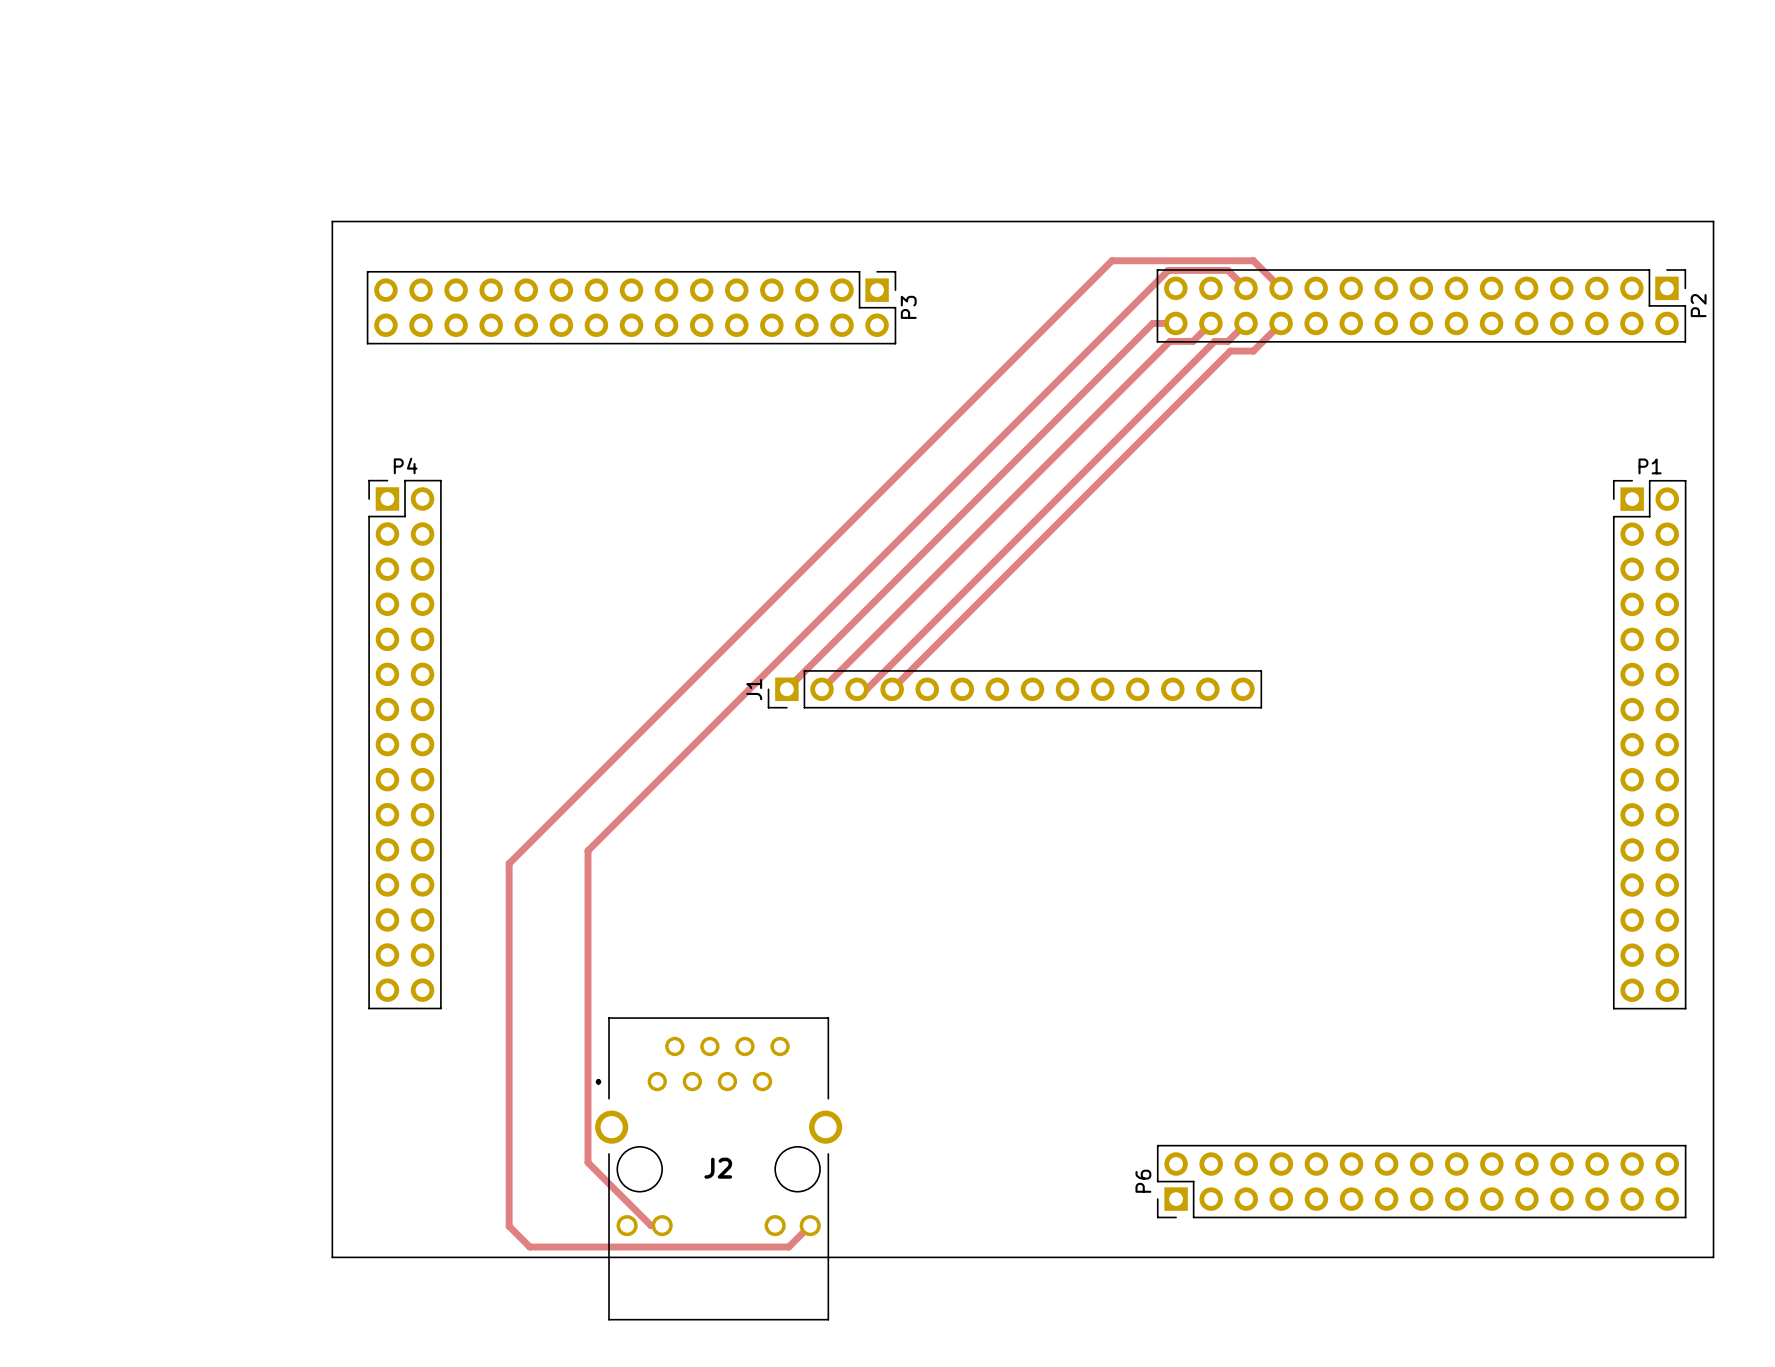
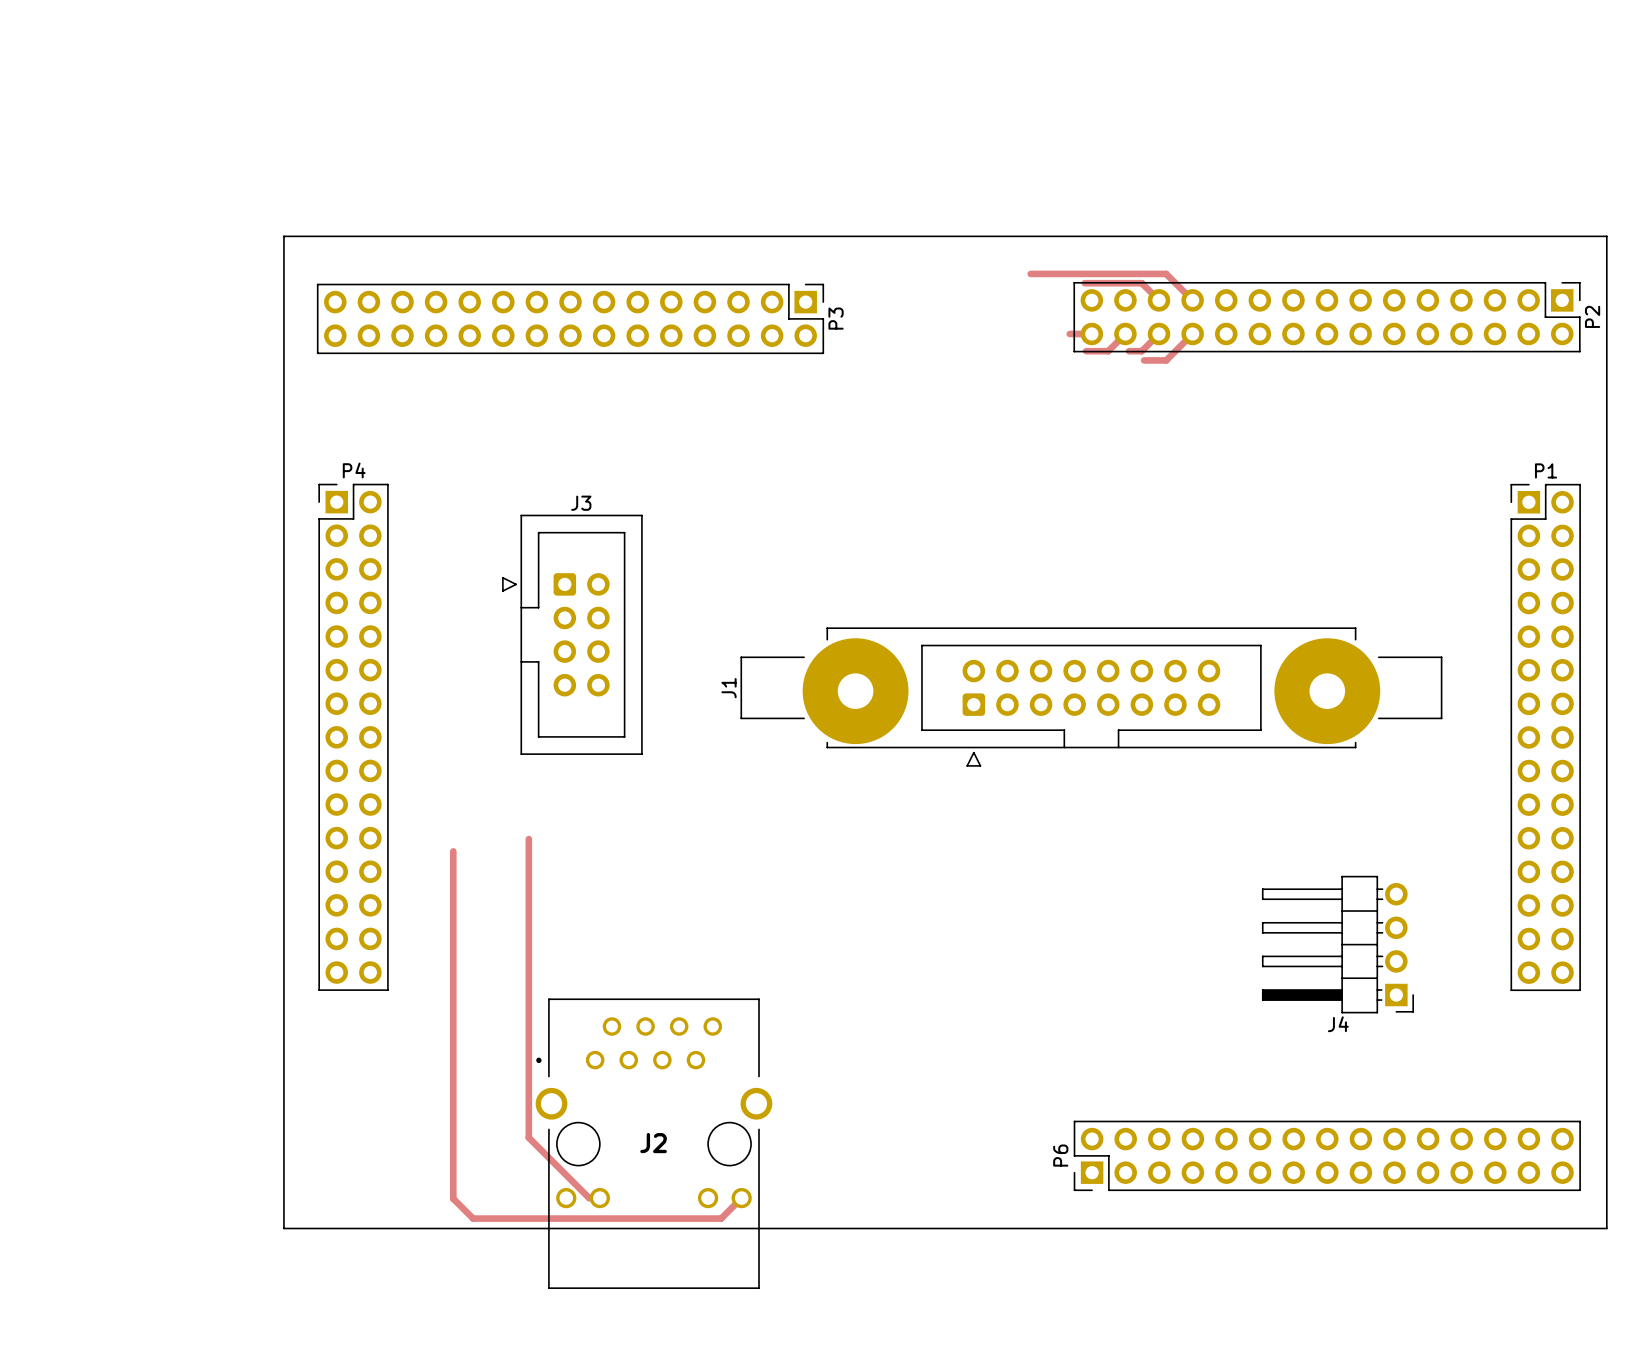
track: (1112, 260) (509, 863) -> none
track: (1168, 270) (588, 850) -> none
track: (1152, 323) (786, 689) -> none
track: (1169, 341) (821, 689) -> none
track: (1214, 341) (866, 689) (857, 689) -> none
track: (1230, 351) (892, 689) -> none
J3: none -> (572, 634)
J1 footprint: [767, 670, 1263, 709] -> [740, 627, 1443, 767]
J1 name position: J1 (754, 689) -> J1 (729, 688)
J4: none -> (1337, 944)

